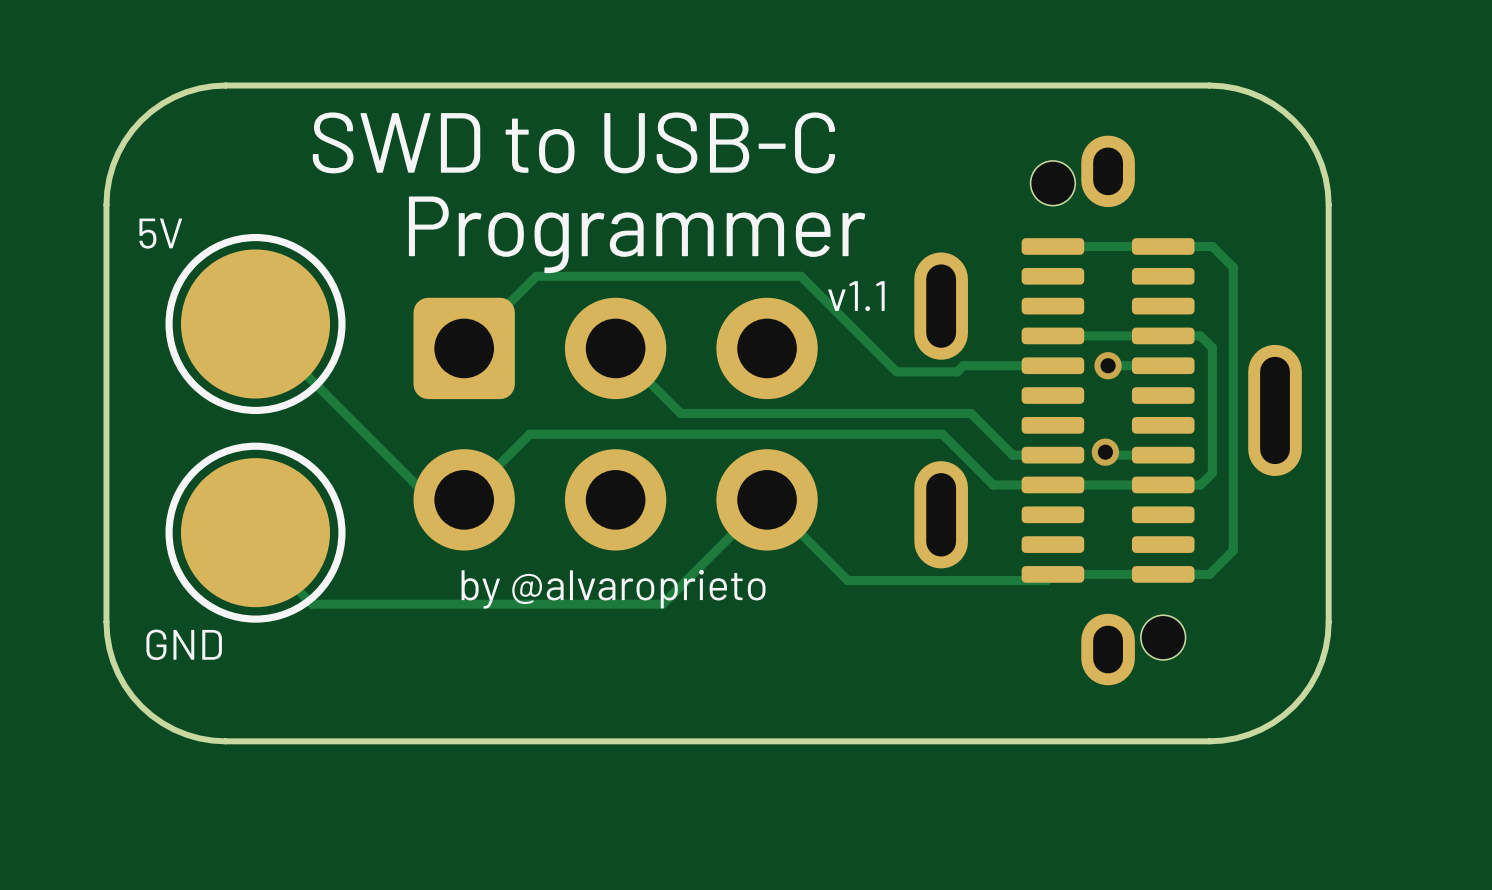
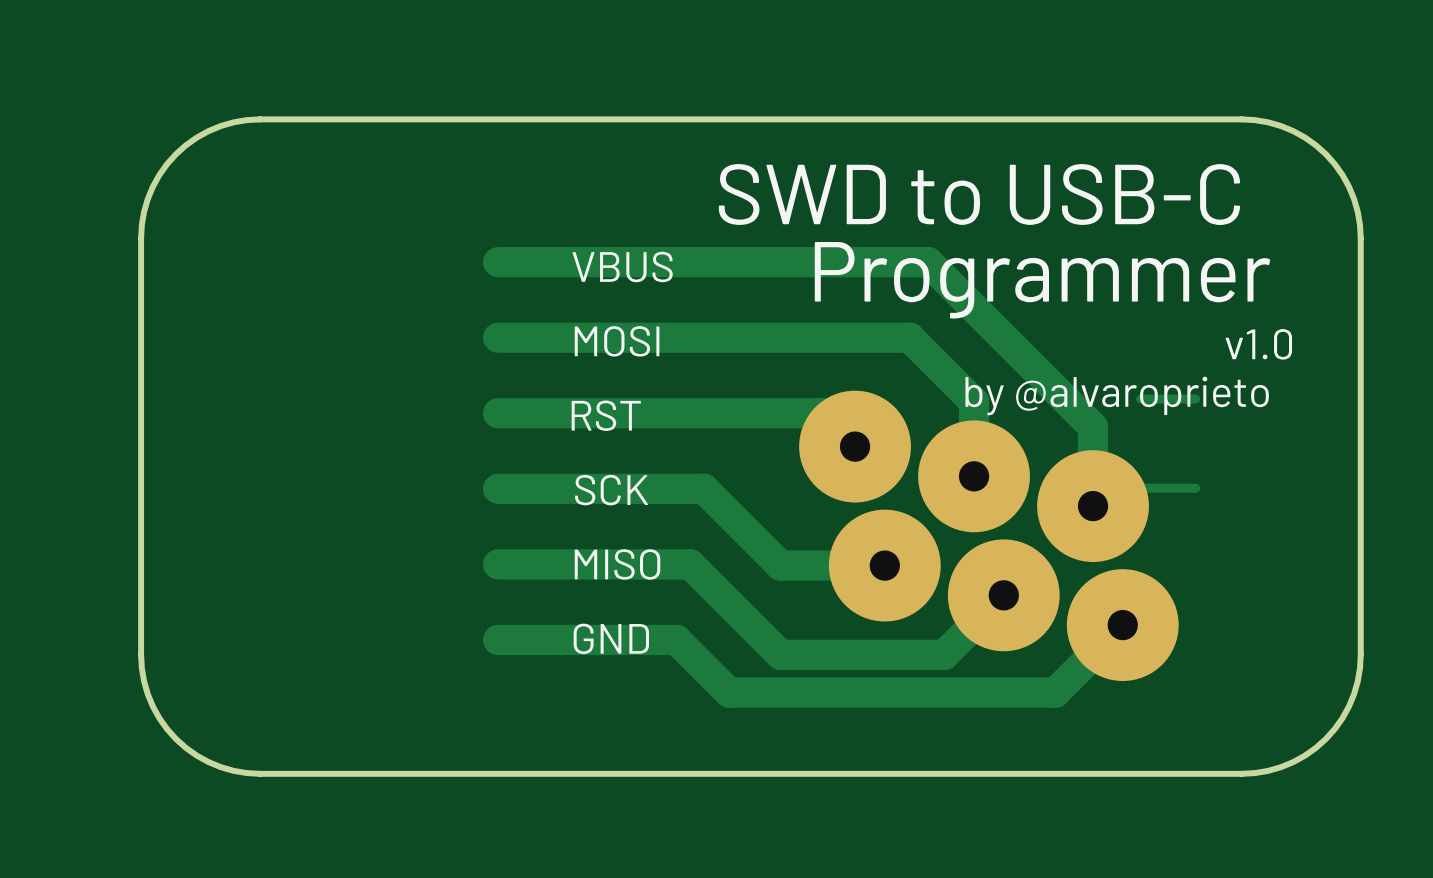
text position: SWD to USB-C (573, 142) -> SWD to USB-C (979, 194)
track: none -> (498, 262) (928, 262) (1093, 427) (1093, 506)
text: 5V (160, 233) -> none
text: none -> VBUS (622, 267)
text position: Programmer (637, 234) -> Programmer (1042, 280)
track: (1052, 246) (1212, 246) (1233, 267) (1233, 550) (1209, 574) (1052, 574) (1046, 580) (847, 580) (767, 499) (662, 604) (312, 604) (270, 562) -> none
text: v1.1 (856, 296) -> none
track: none -> (498, 337) (909, 337) (974, 401) (974, 476)
text: none -> MOSI (617, 341)
text: none -> v1.0 (1258, 344)
track: (255, 324) (431, 499) (464, 499) -> none
part: (255, 324) -> none
track: (1052, 335) (1200, 335) (1212, 347) (1212, 473) (1200, 484) (993, 484) (942, 434) (529, 434) (464, 499) -> none
track: (464, 348) (536, 276) (801, 276) (896, 371) (957, 371) (963, 365) (1052, 365) -> none
track: (615, 348) (680, 413) (970, 413) (1012, 455) (1052, 455) -> none
via: (1108, 365) -> none
track: none -> (498, 413) (821, 413) (855, 446)
text: none -> RST (606, 415)
part: (1108, 410) -> none
part: none -> (855, 446)
part: (615, 424) -> none
part: none -> (974, 476)
via: (1105, 452) -> none
track: none -> (498, 488) (703, 488) (780, 565) (884, 565)
text: none -> SCK (611, 490)
part: none -> (1093, 506)
track: none -> (498, 564) (690, 564) (780, 654) (944, 654) (1003, 595)
text: none -> MISO (617, 564)
part: (255, 532) -> none
part: none -> (884, 565)
part: none -> (1003, 595)
text position: by @alvaroprieto (613, 589) -> by @alvaroprieto (1117, 395)
track: none -> (1122, 625) (1055, 692) (729, 692) (676, 639) (498, 639)
part: none -> (1122, 625)
text position: GND (184, 644) -> GND (611, 638)

